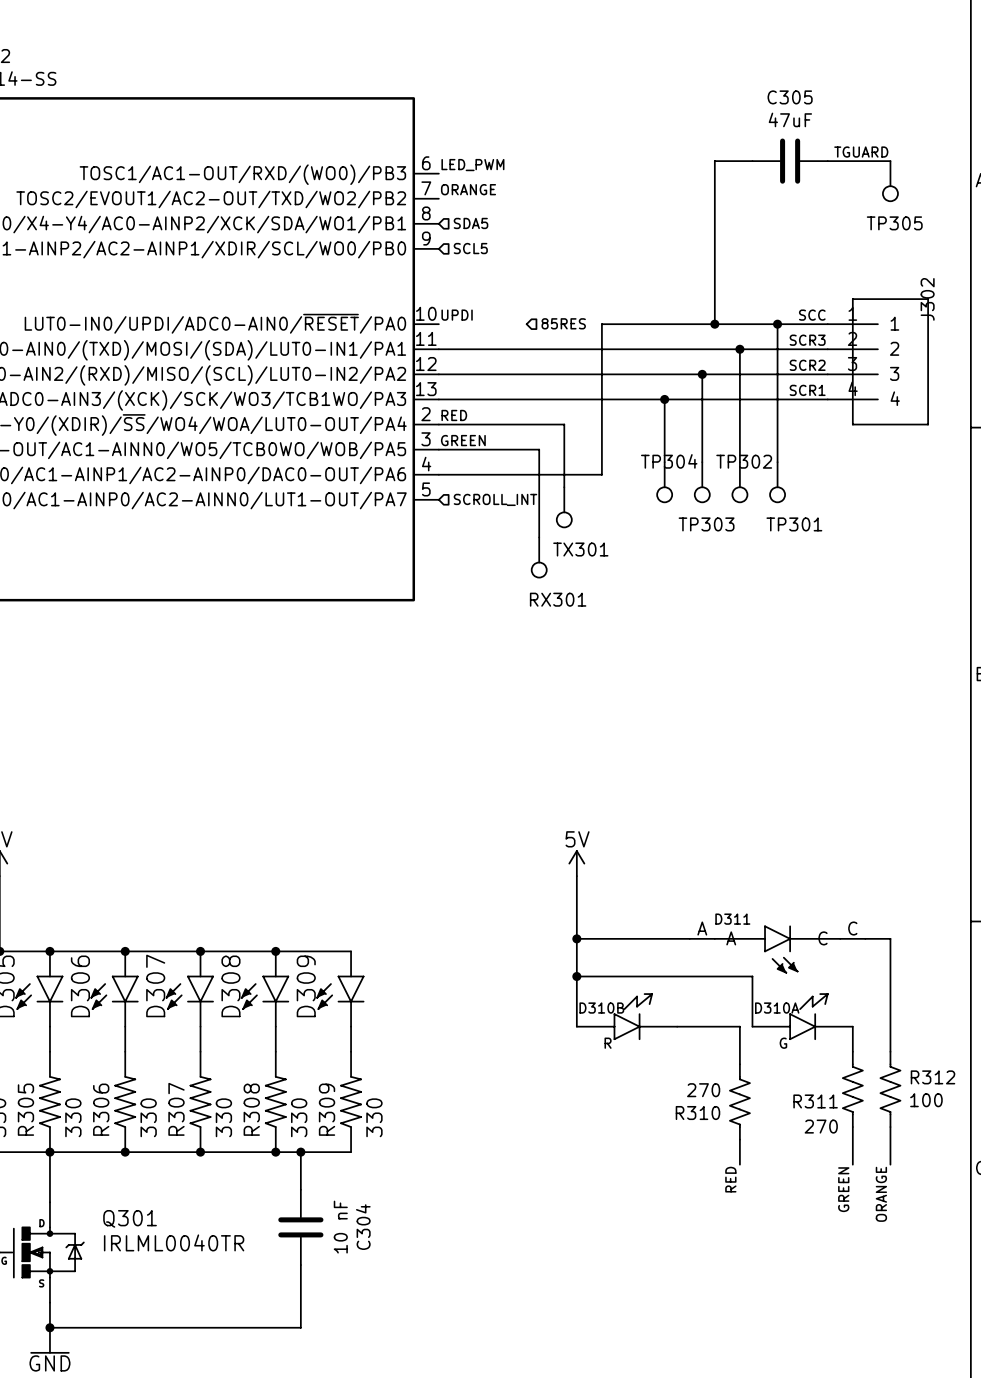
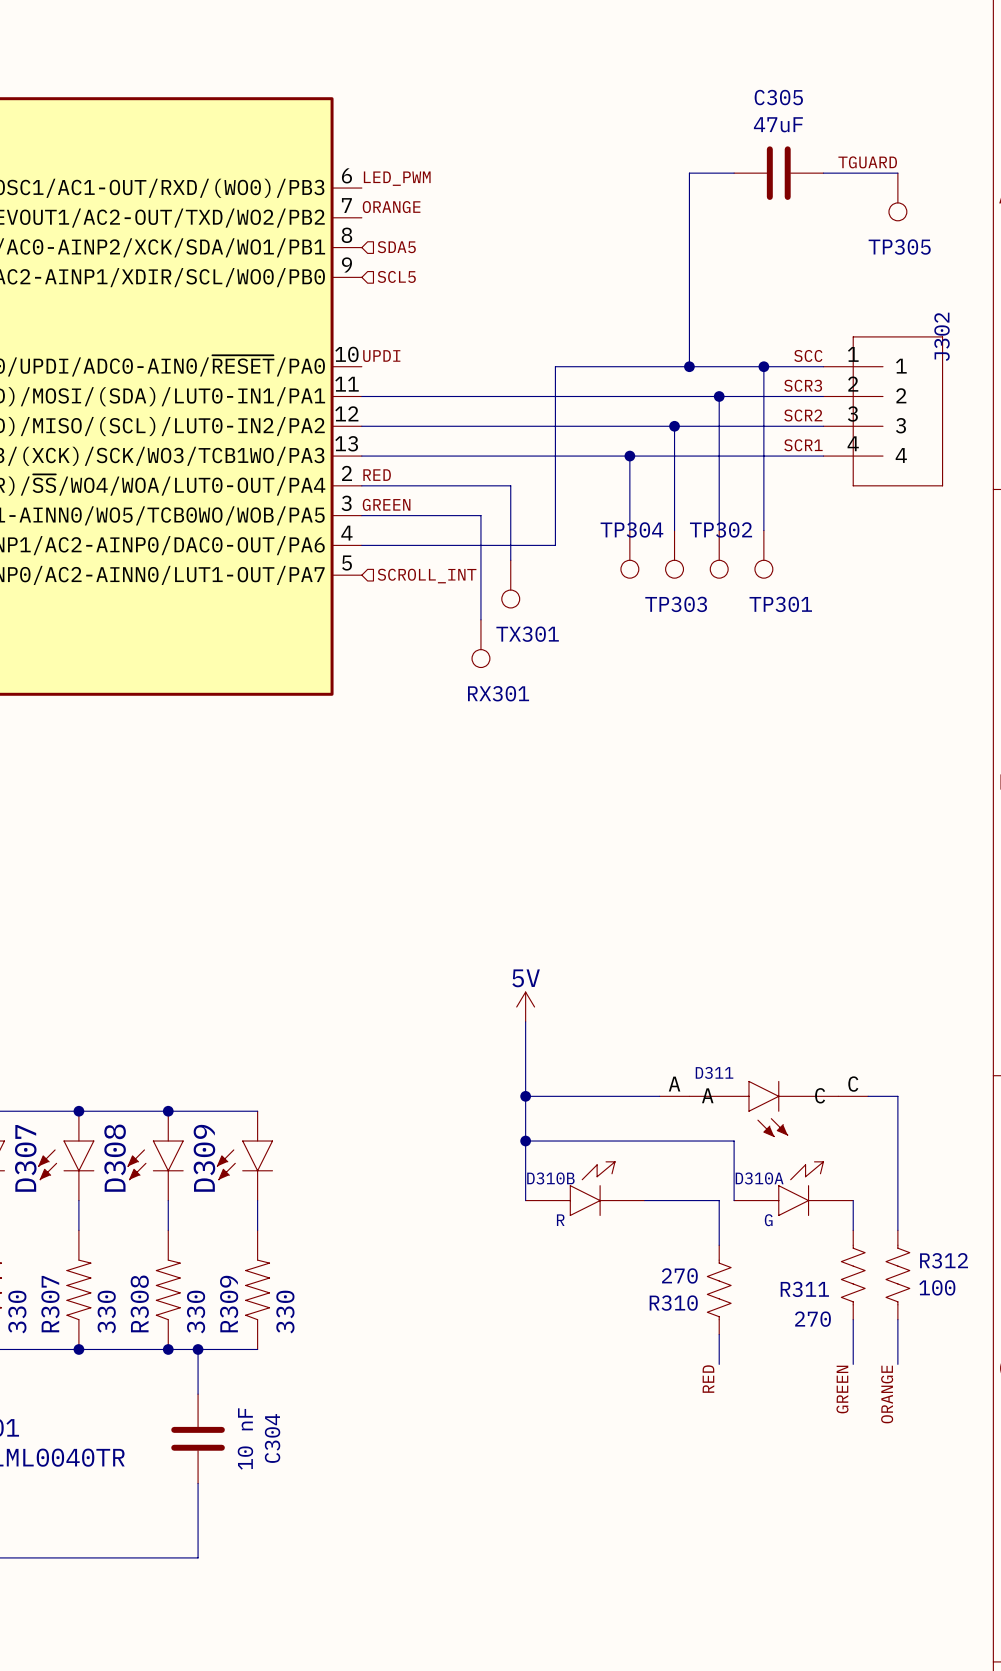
hierarchical label: 85RES (563, 323) -> none

